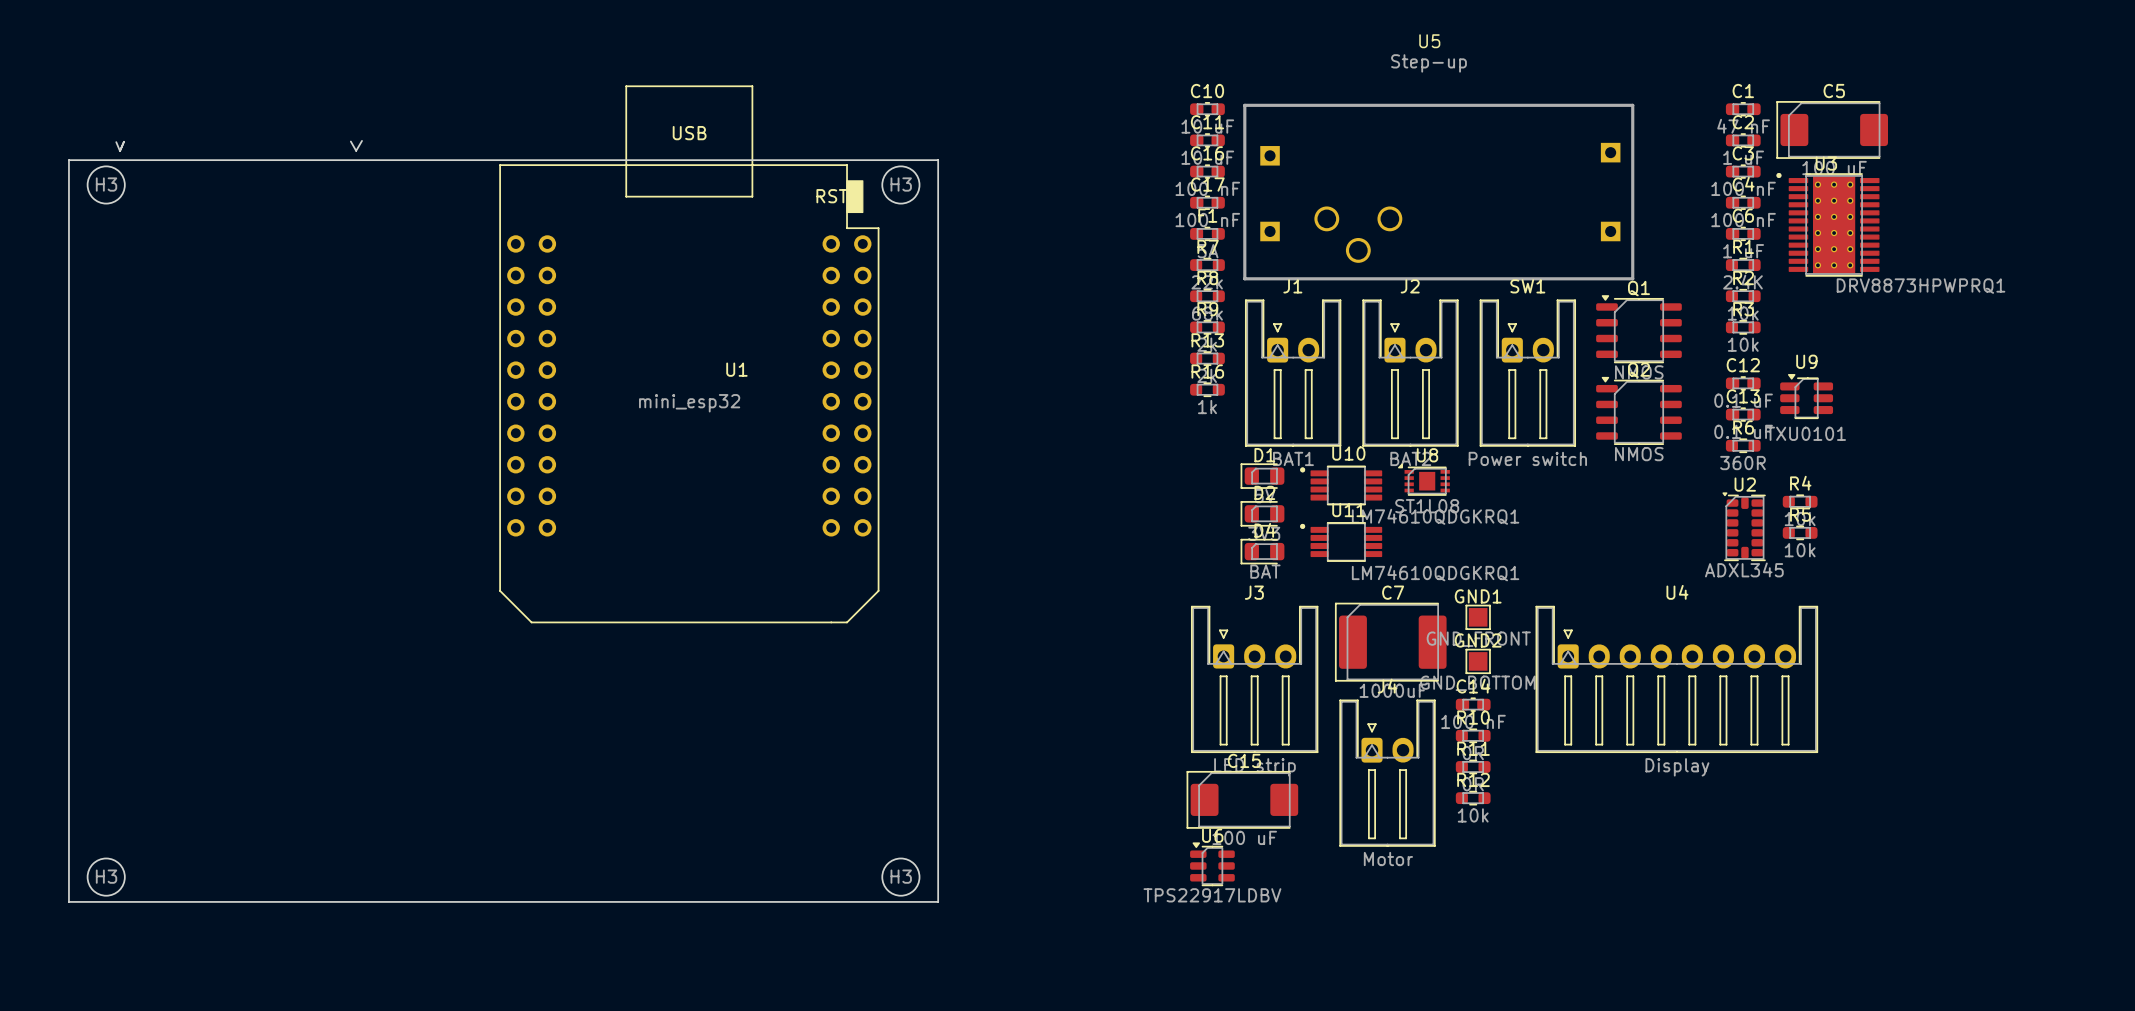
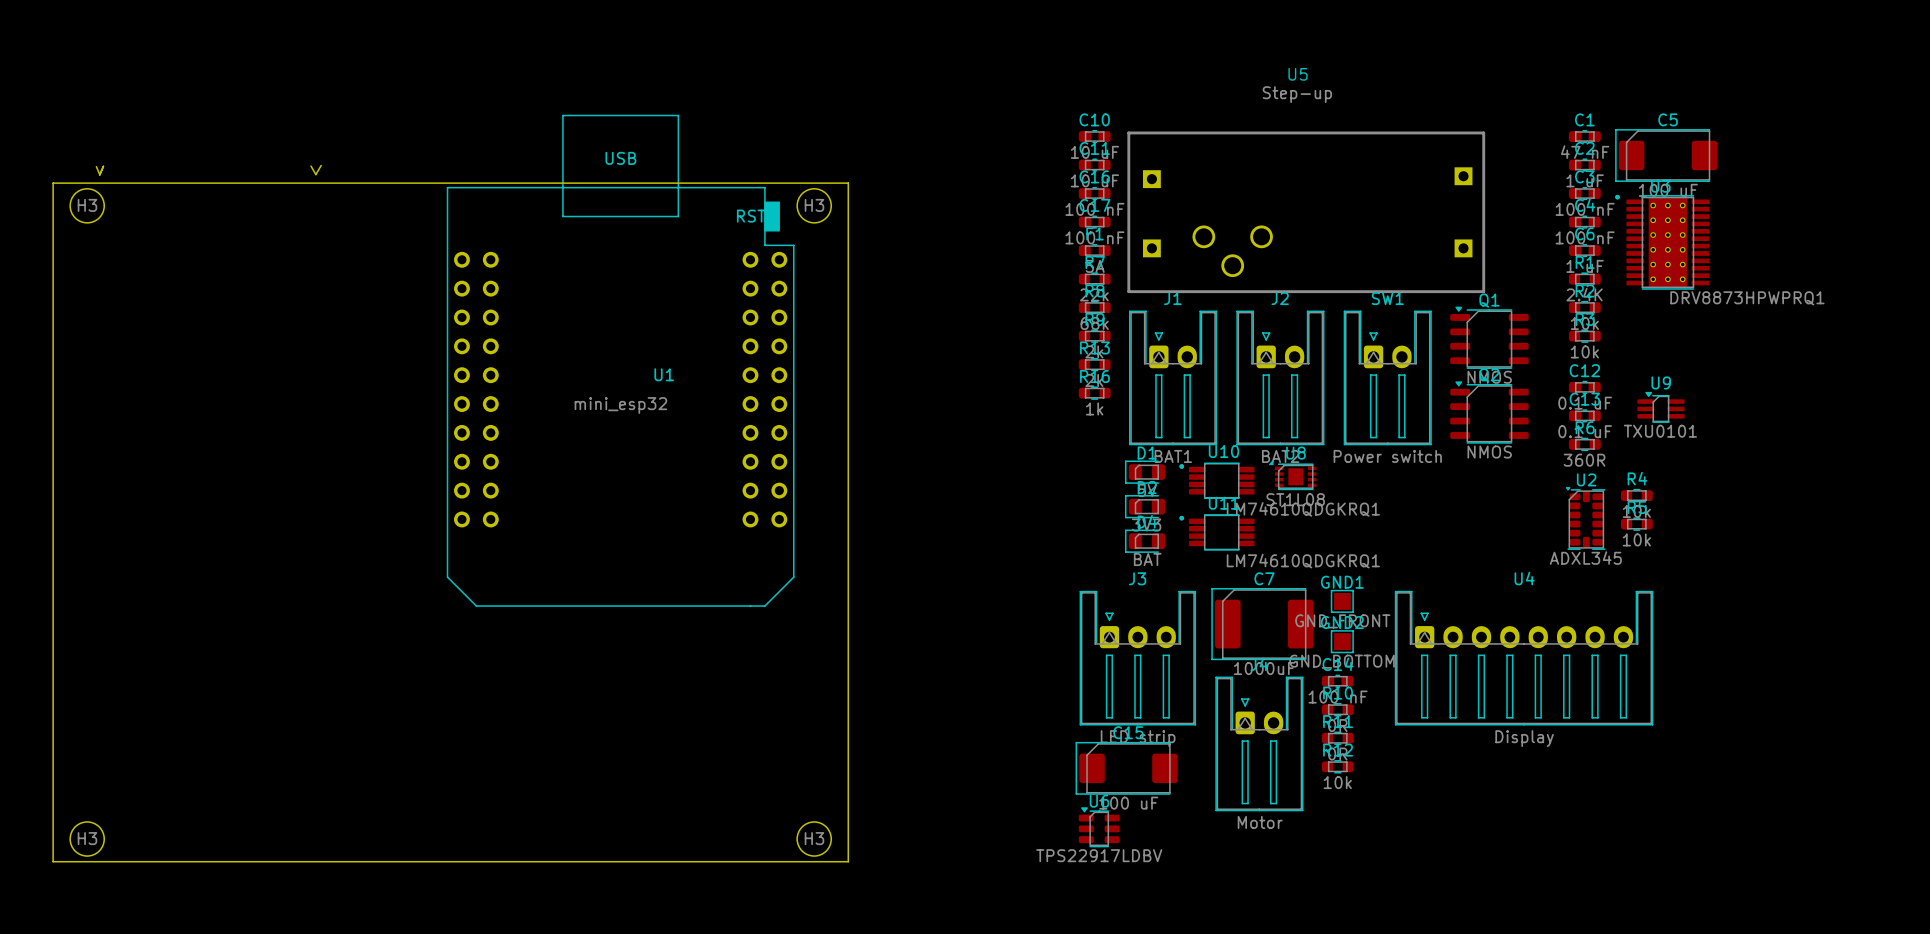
U9 footprint: [1780, 374, 1834, 419] -> [1637, 391, 1685, 423]

